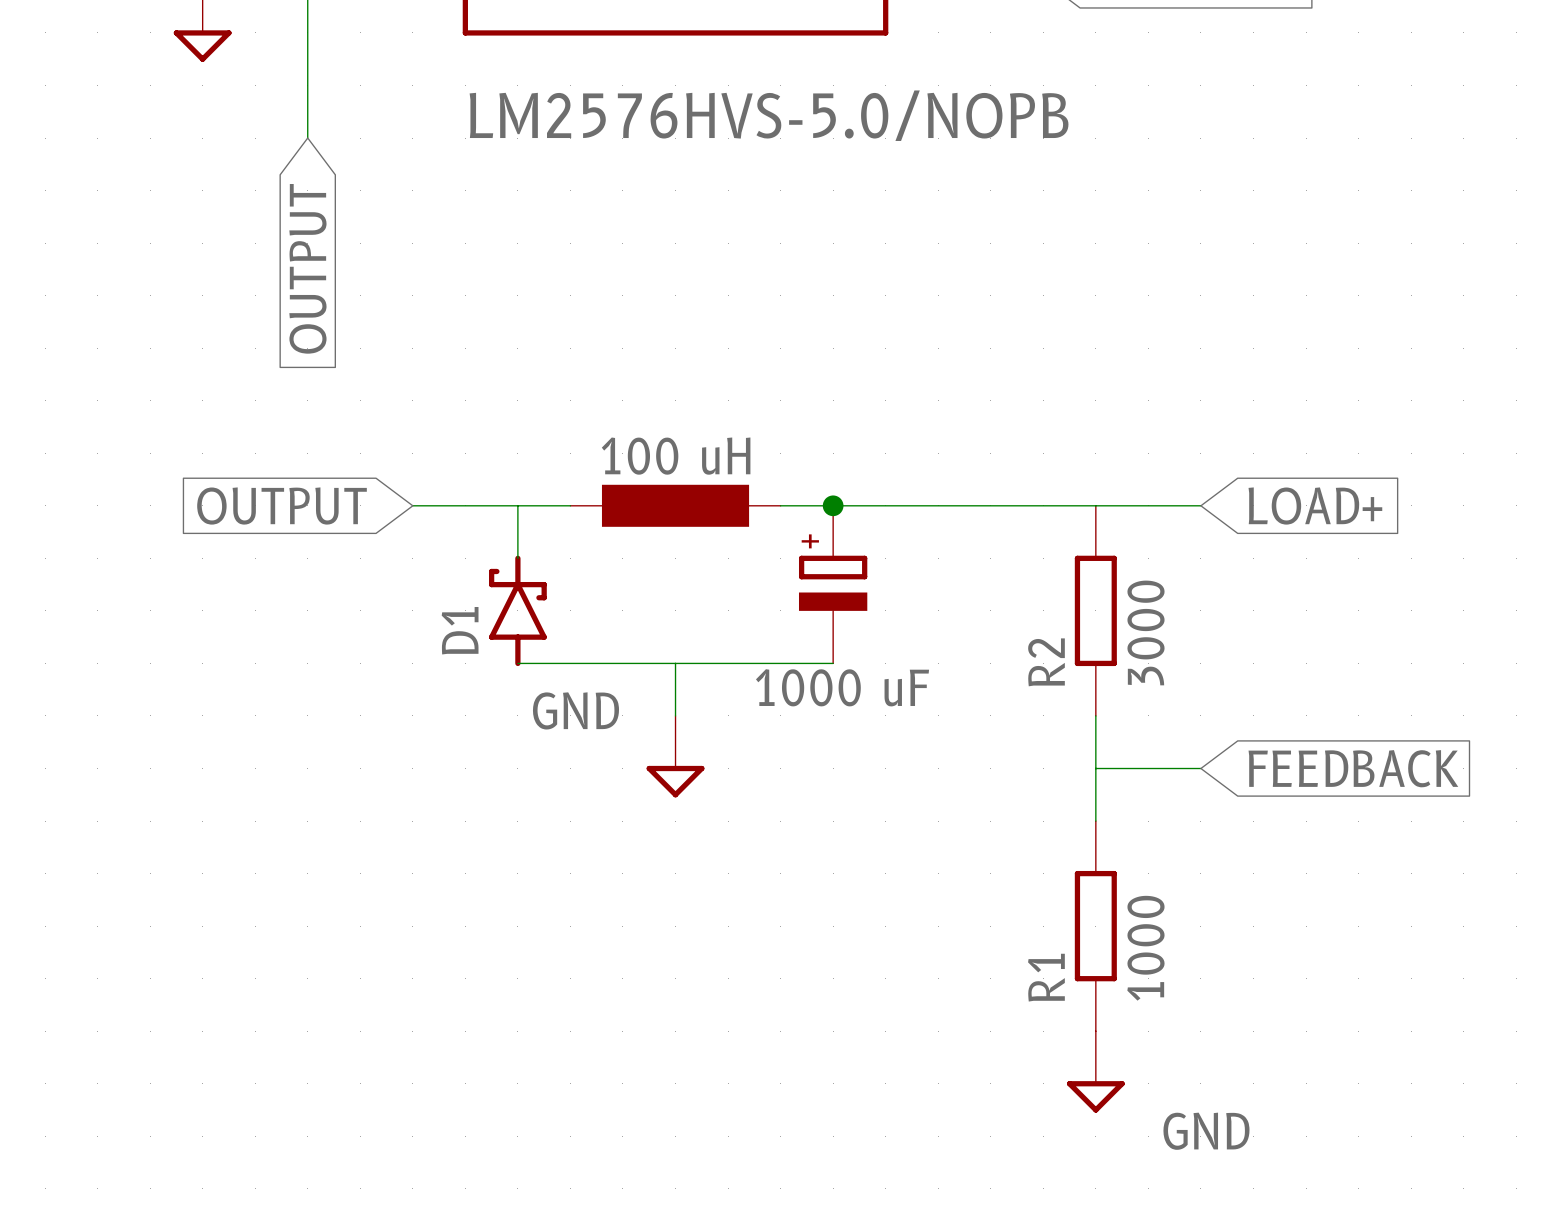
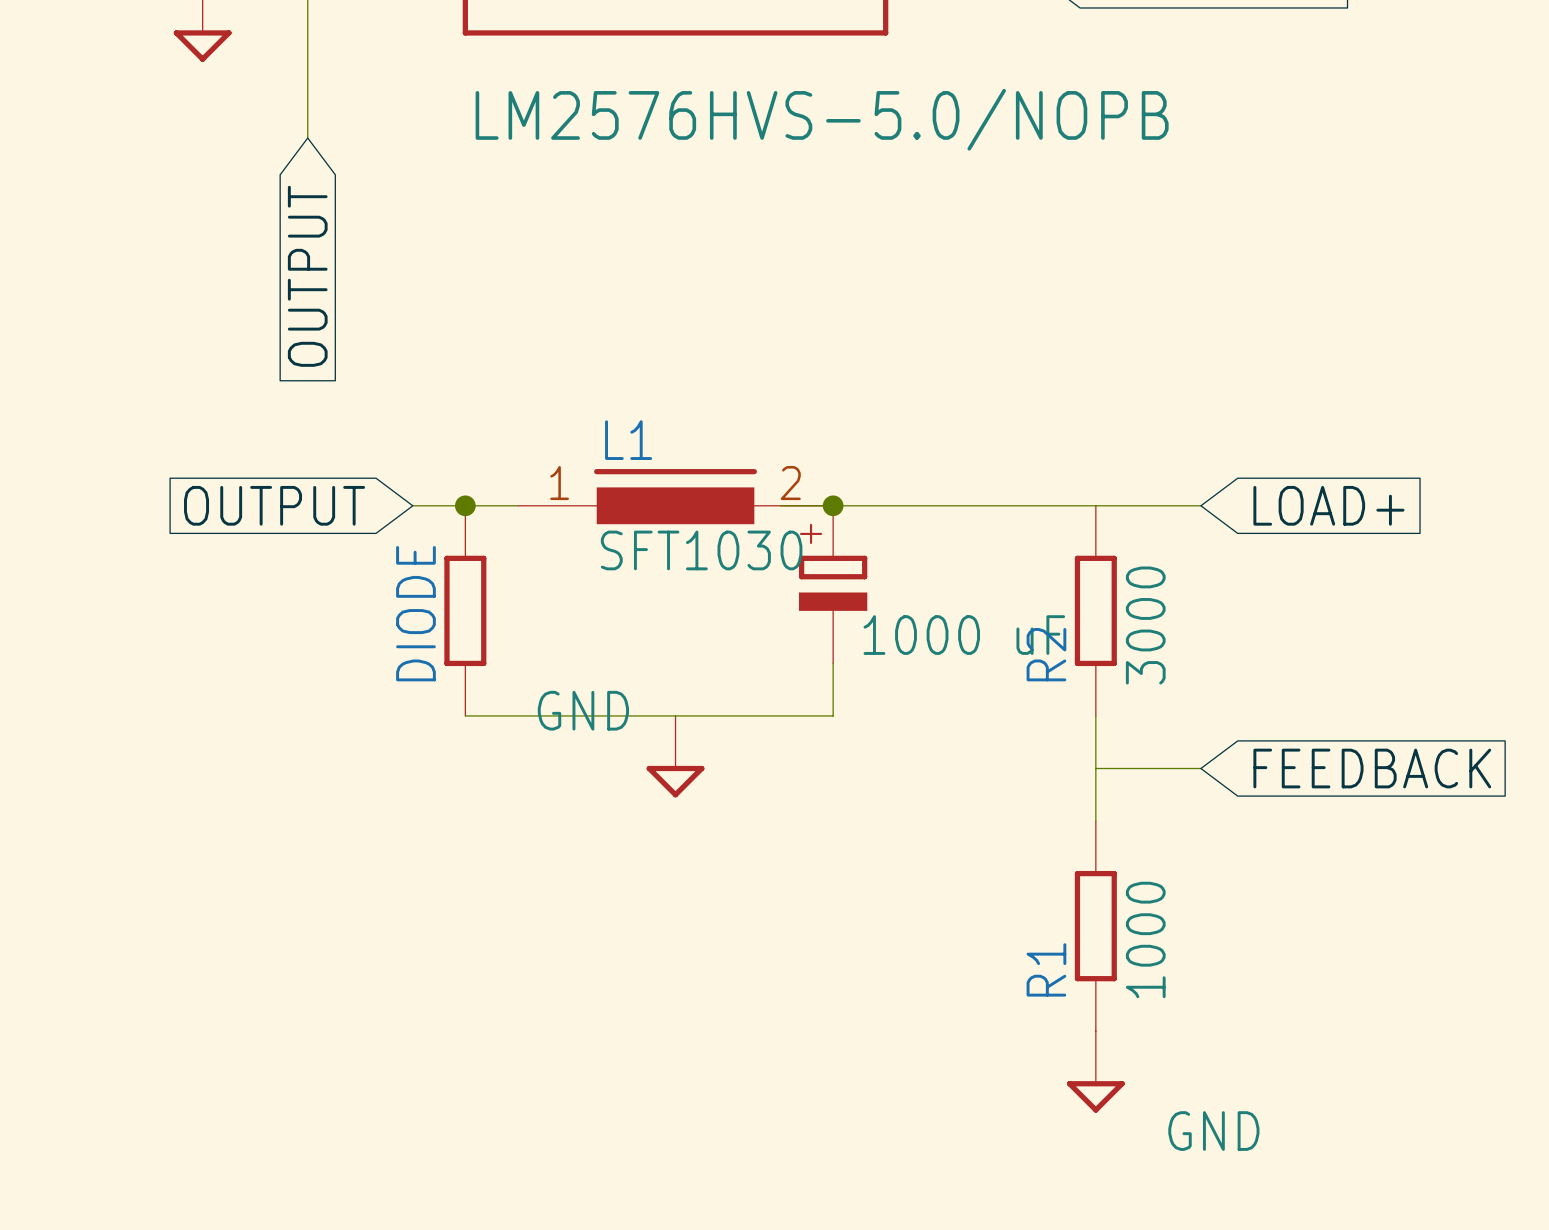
L1: none -> SFT1030 (675, 496)
junction: none -> (465, 505)
wire: (570, 505) (517, 505) (517, 558) -> none
part: 100 uH (675, 505) -> none
DIODE: none -> (465, 610)
D1: (517, 610) -> none
wire: (517, 663) (833, 663) -> (465, 715) (833, 715) (833, 663)
wire: (675, 663) (675, 715) -> none
part value position: 1000 uF (842, 687) -> 1000 uF (964, 635)

